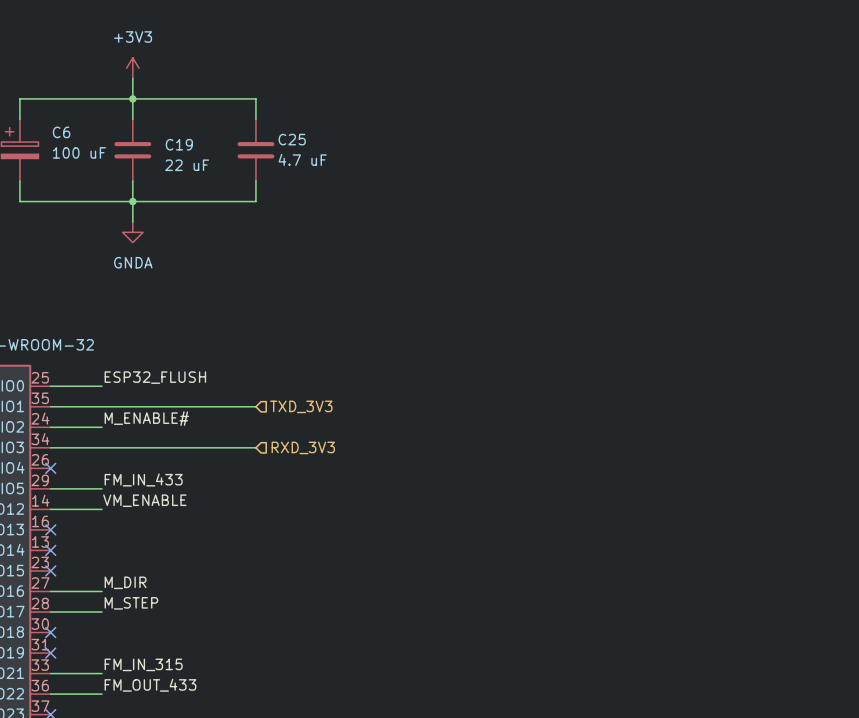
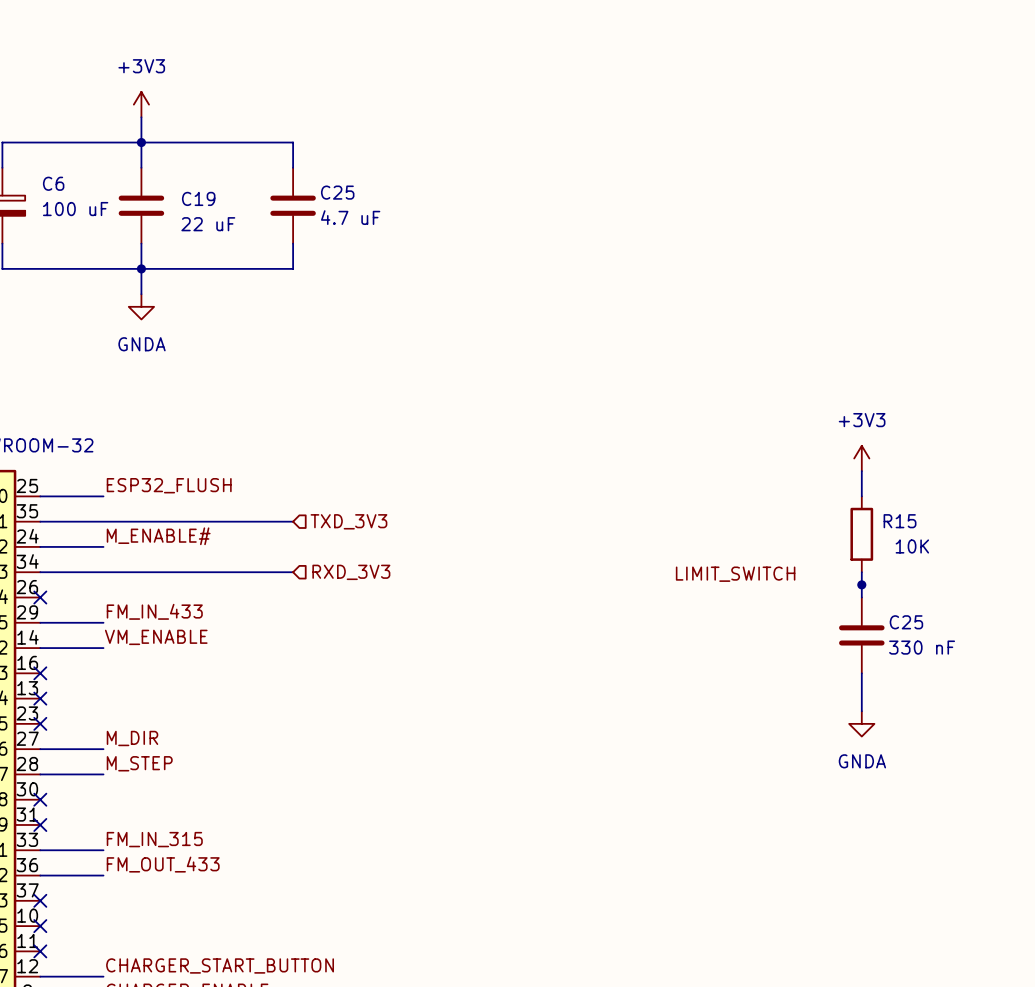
power symbol: none -> +3V3 (861, 458)
wire: none -> (861, 471) (861, 496)
R15: none -> 10K (861, 534)
wire: none -> (861, 572) (861, 597)
label: none -> LIMIT_SWITCH (735, 574)
junction: none -> (861, 584)
C25: none -> 330 nF (861, 635)
wire: none -> (861, 673) (861, 711)
power symbol: none -> GNDA (861, 723)

